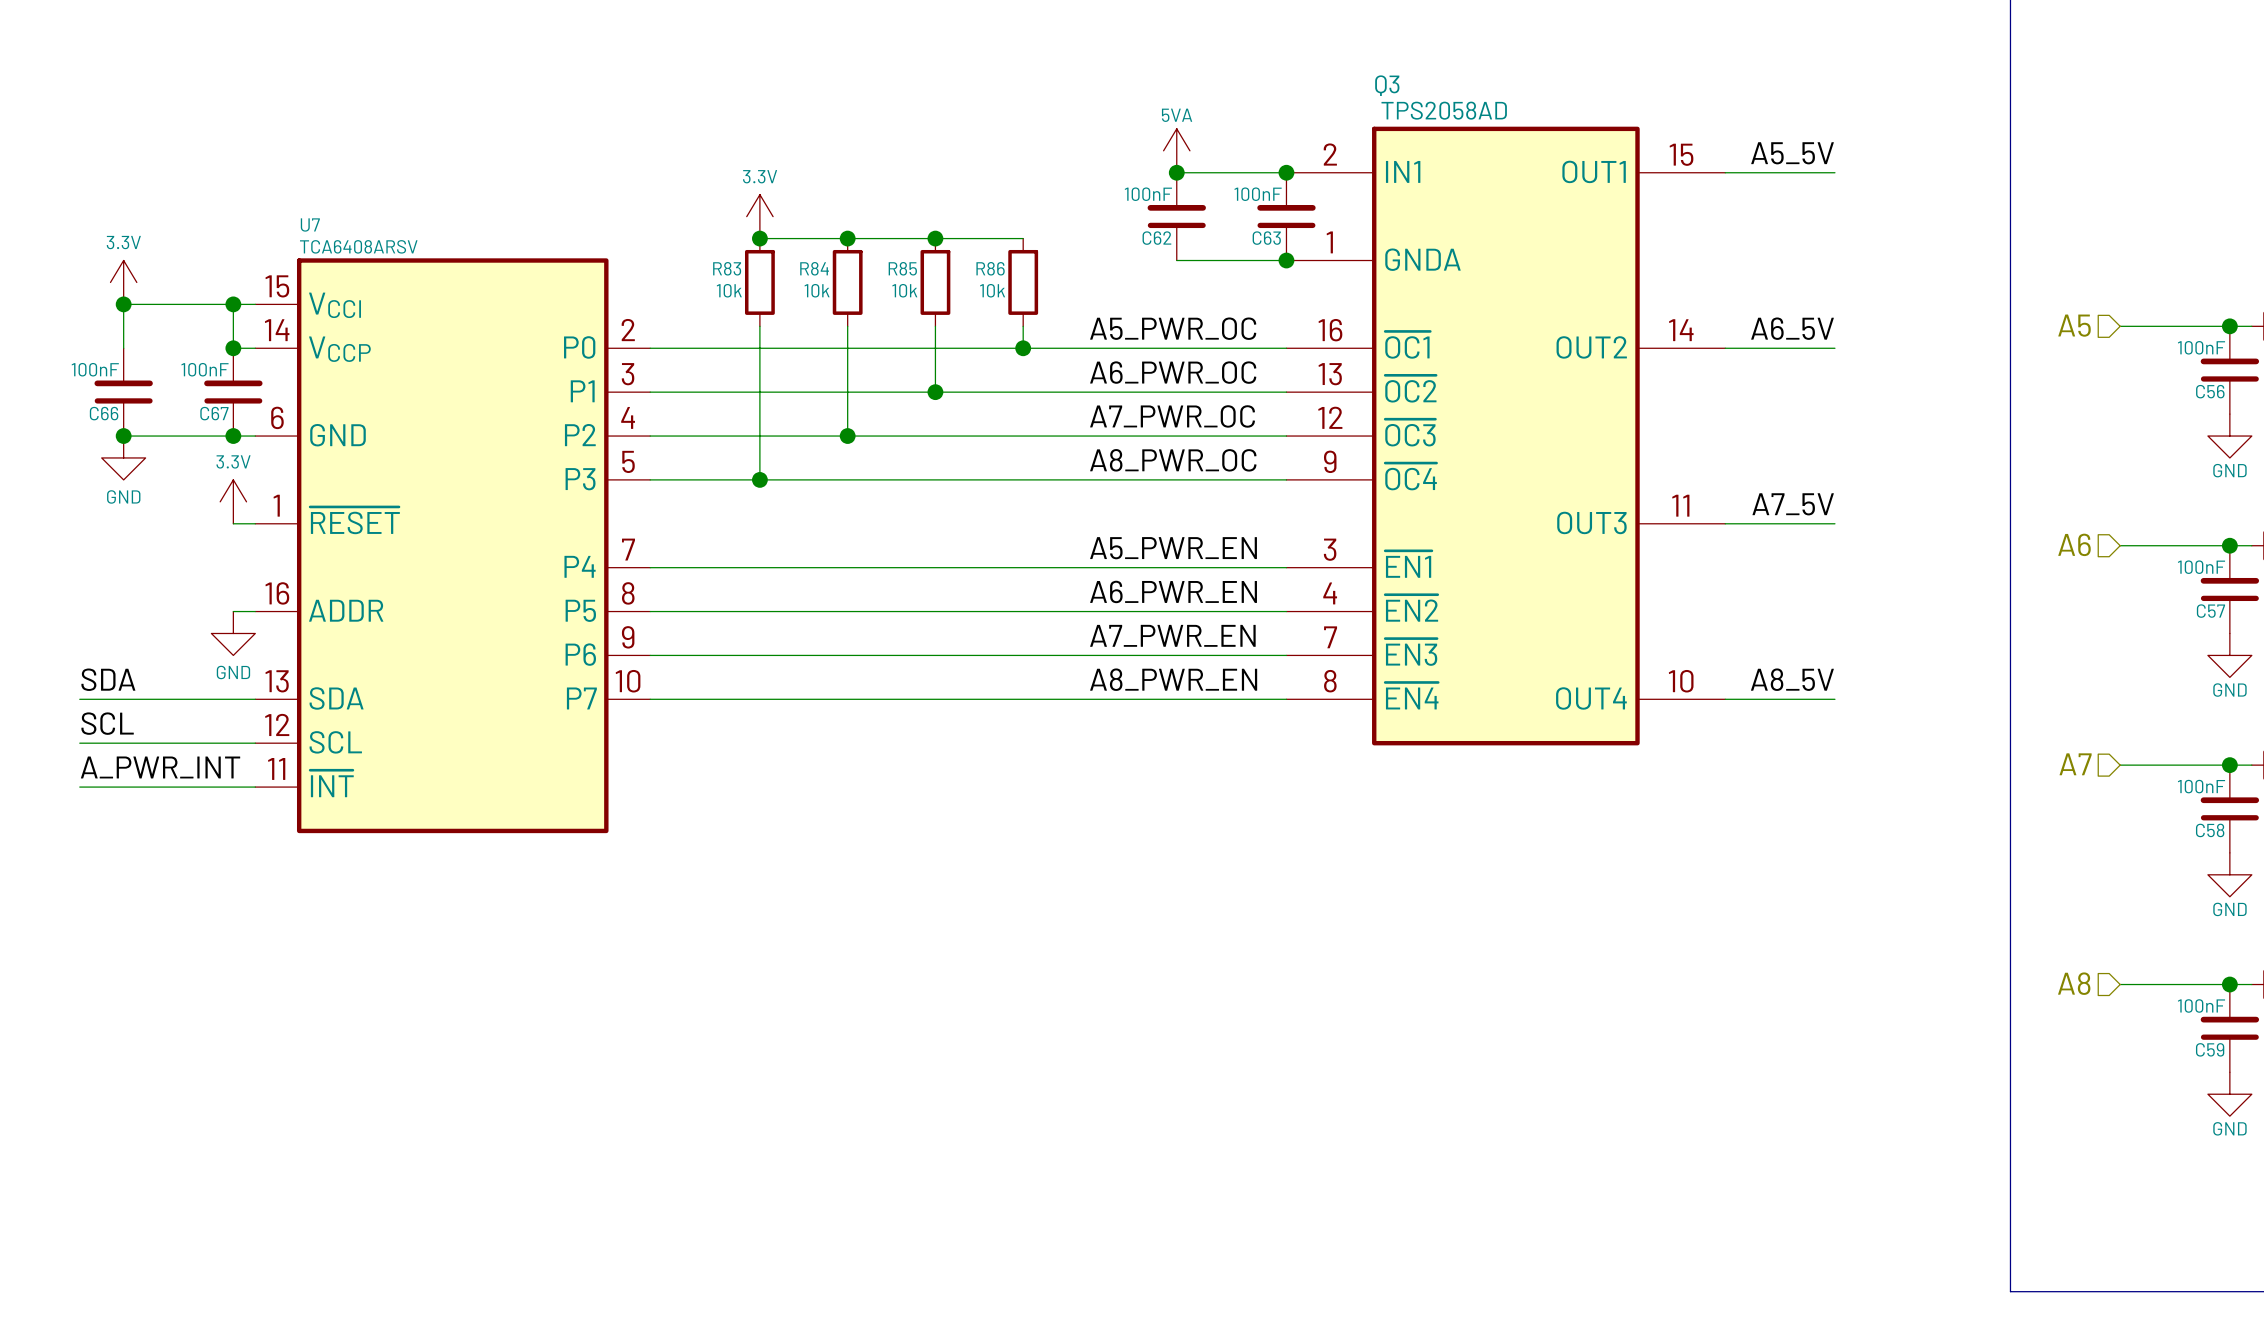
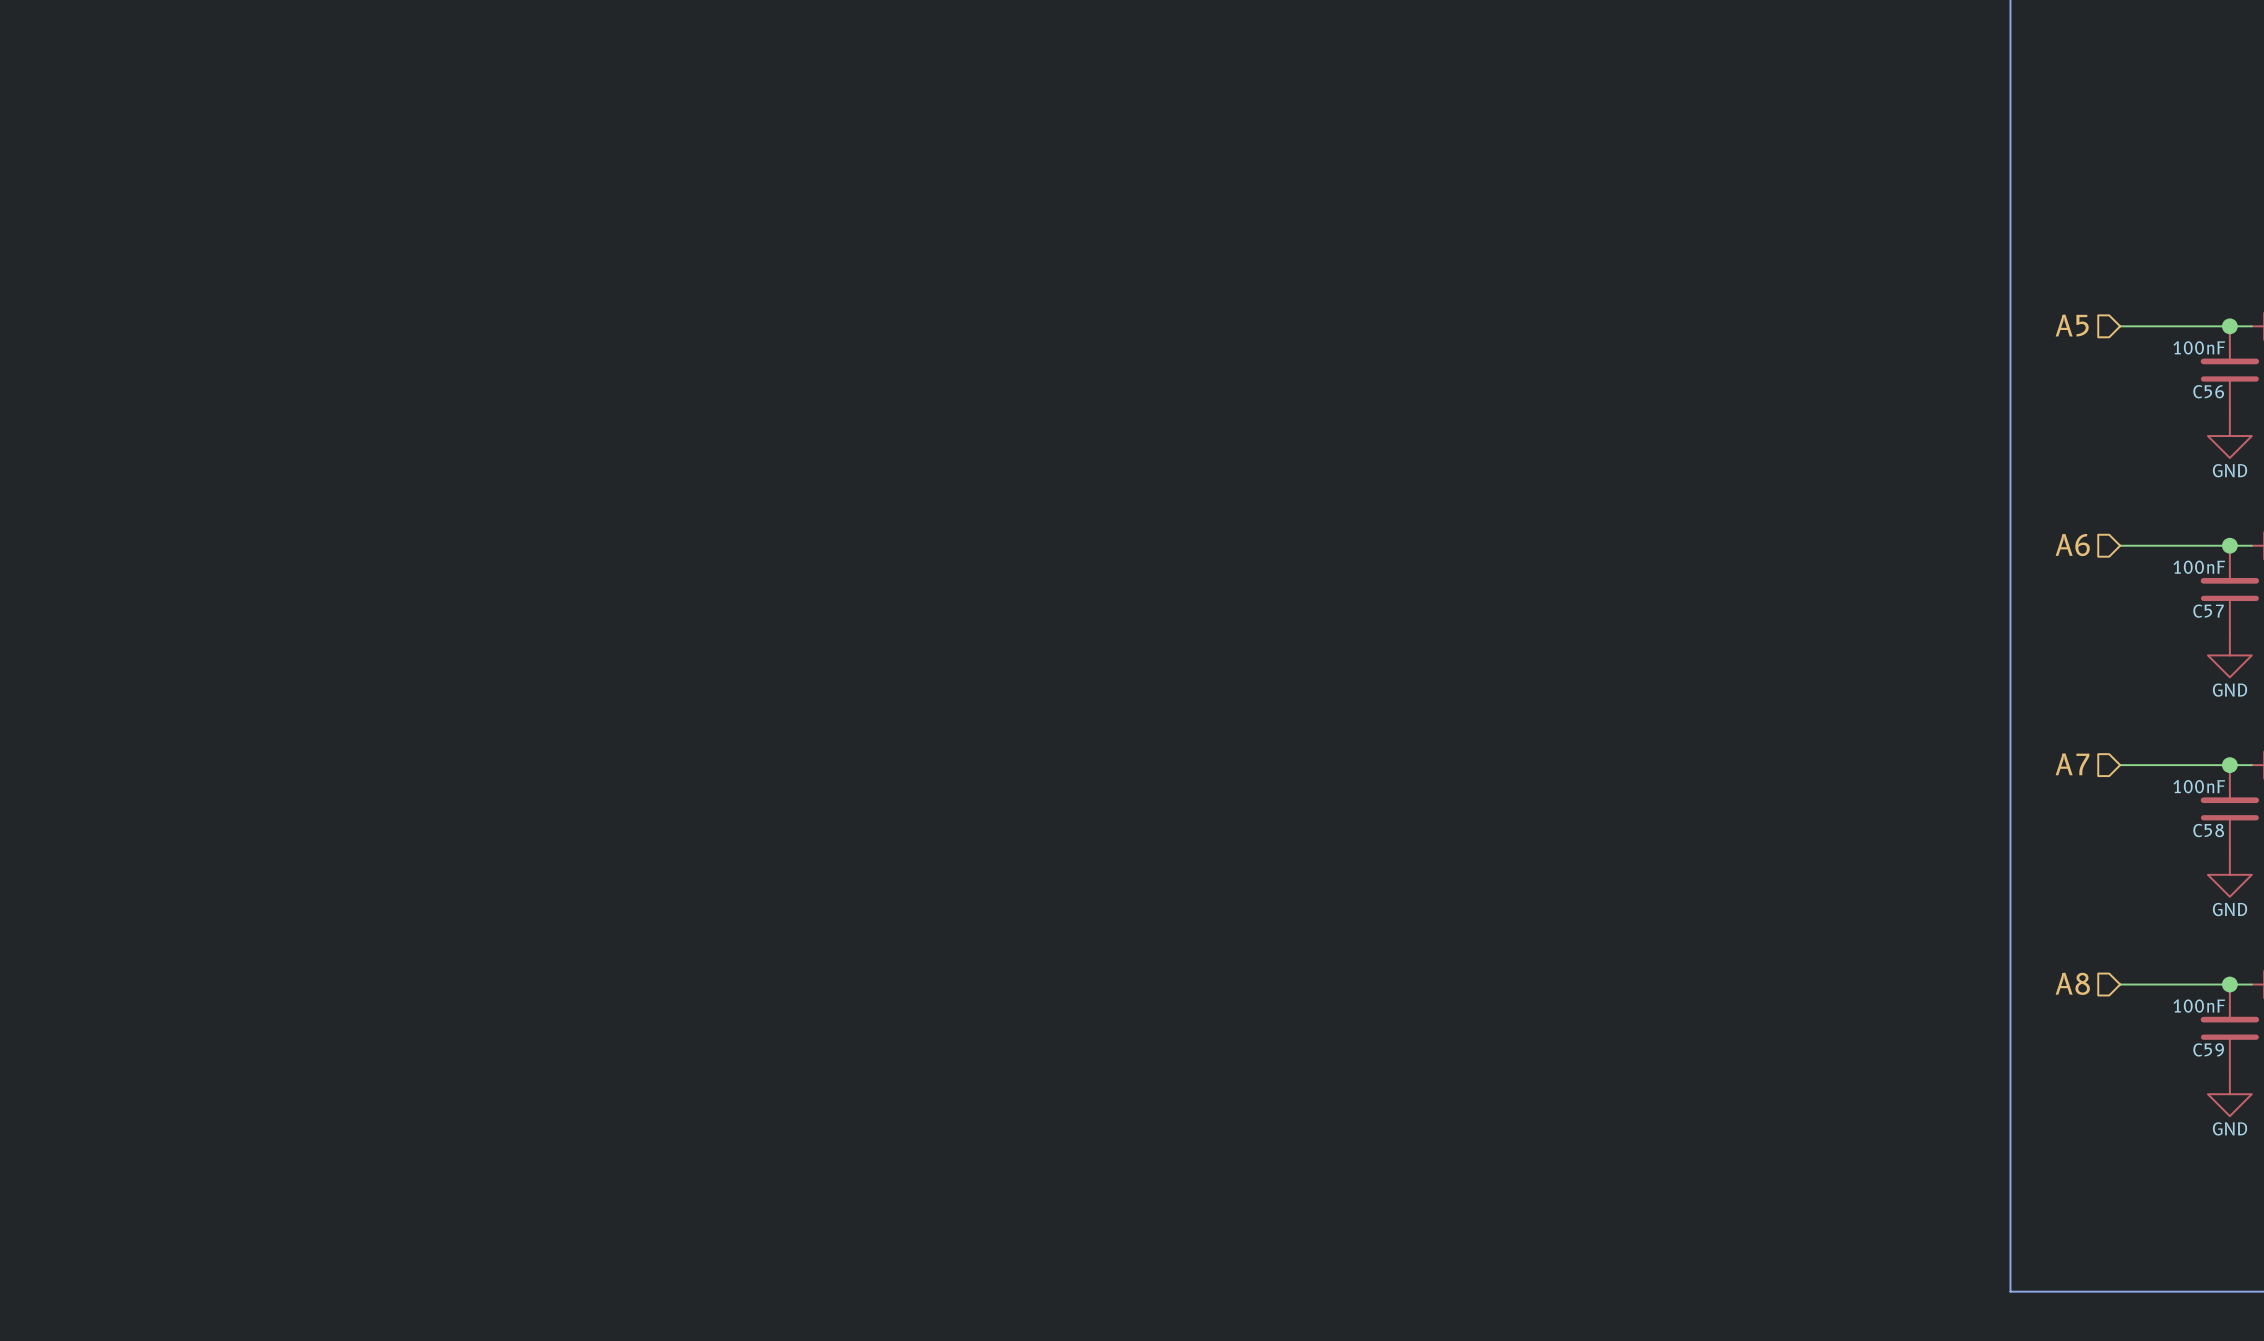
power symbol: 5VA (1176, 150) -> none
label: A5_5V (1792, 153) -> none
wire: (1176, 172) (1286, 172) -> none
junction: (1176, 172) -> none
junction: (1286, 172) -> none
wire: (1725, 172) (1834, 172) -> none
power symbol: 3.3V (759, 216) -> none
C62: 100nF (1176, 216) -> none
C63: 100nF (1286, 216) -> none
wire: (759, 238) (1023, 238) -> none
junction: (759, 238) -> none
junction: (847, 238) -> none
junction: (935, 238) -> none
wire: (1176, 260) (1286, 260) -> none
junction: (1286, 260) -> none
power symbol: 3.3V (123, 282) -> none
R83: 10k (759, 282) -> none
R84: 10k (847, 282) -> none
R85: 10k (935, 282) -> none
R86: 10k (1023, 282) -> none
junction: (123, 304) -> none
wire: (233, 304) (233, 348) (255, 348) -> none
junction: (233, 304) -> none
wire: (255, 304) (123, 304) (123, 348) -> none
wire: (759, 326) (759, 479) -> none
wire: (847, 326) (847, 436) -> none
wire: (935, 326) (935, 392) -> none
wire: (1023, 326) (1023, 348) -> none
label: A5_PWR_OC (1173, 328) -> none
label: A6_5V (1792, 328) -> none
junction: (233, 348) -> none
wire: (650, 348) (1286, 348) -> none
junction: (1023, 348) -> none
wire: (1725, 348) (1834, 348) -> none
label: A6_PWR_OC (1173, 372) -> none
C66: 100nF (123, 392) -> none
C67: 100nF (233, 392) -> none
wire: (650, 392) (1286, 392) -> none
junction: (935, 392) -> none
label: A7_PWR_OC (1172, 416) -> none
wire: (123, 436) (255, 436) -> none
junction: (123, 436) -> none
junction: (233, 436) -> none
wire: (650, 436) (1286, 436) -> none
junction: (847, 436) -> none
Q3: TPS2058AD (1505, 436) -> none
power symbol: GND (123, 457) -> none
label: A8_PWR_OC (1173, 460) -> none
wire: (650, 479) (1286, 479) -> none
junction: (759, 479) -> none
power symbol: 3.3V (233, 501) -> none
label: A7_5V (1793, 504) -> none
wire: (233, 523) (255, 523) -> none
wire: (1725, 523) (1834, 523) -> none
U7: TCA6408ARSV (452, 545) -> none
label: A5_PWR_EN (1173, 548) -> none
wire: (650, 567) (1286, 567) -> none
label: A6_PWR_EN (1173, 591) -> none
wire: (233, 611) (255, 611) -> none
wire: (650, 611) (1286, 611) -> none
power symbol: GND (233, 633) -> none
label: A7_PWR_EN (1172, 635) -> none
wire: (650, 655) (1286, 655) -> none
label: SDA (108, 679) -> none
label: A8_PWR_EN (1173, 679) -> none
label: A8_5V (1792, 679) -> none
wire: (79, 699) (255, 699) -> none
wire: (650, 699) (1286, 699) -> none
wire: (1725, 699) (1834, 699) -> none
label: SCL (107, 723) -> none
wire: (79, 743) (255, 743) -> none
label: A_PWR_INT (160, 767) -> none
wire: (79, 787) (255, 787) -> none

